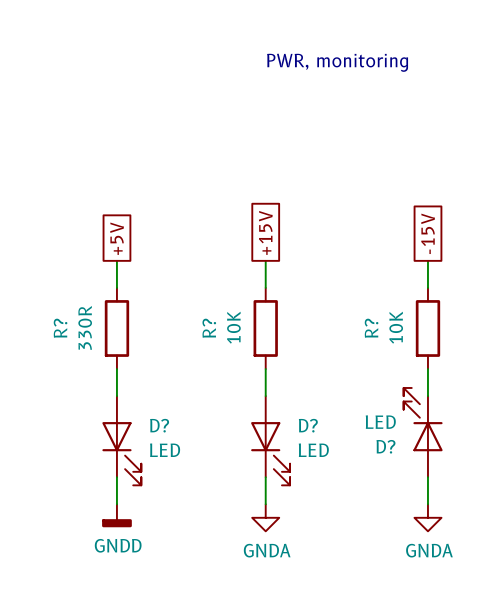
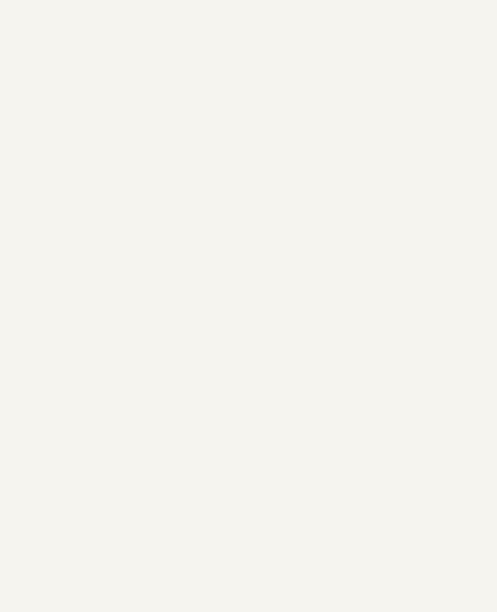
text: PWR, monitoring (337, 62) -> none
global label: +15V (265, 232) -> none
global label: -15V (428, 233) -> none
global label: +5V (117, 238) -> none
wire: (116, 260) (116, 287) -> none
wire: (265, 260) (265, 287) -> none
wire: (427, 260) (427, 287) -> none
R?: 330R (116, 328) -> none
R?: 10K (265, 328) -> none
R?: 10K (427, 328) -> none
wire: (116, 369) (116, 396) -> none
wire: (265, 369) (265, 396) -> none
wire: (427, 369) (427, 396) -> none
D?: LED (423, 432) -> none
D?: LED (121, 440) -> none
D?: LED (270, 440) -> none
wire: (116, 477) (116, 504) -> none
wire: (265, 477) (265, 504) -> none
wire: (427, 477) (427, 504) -> none
power symbol: GNDD (116, 515) -> none
power symbol: GNDA (265, 517) -> none
power symbol: GNDA (427, 517) -> none

